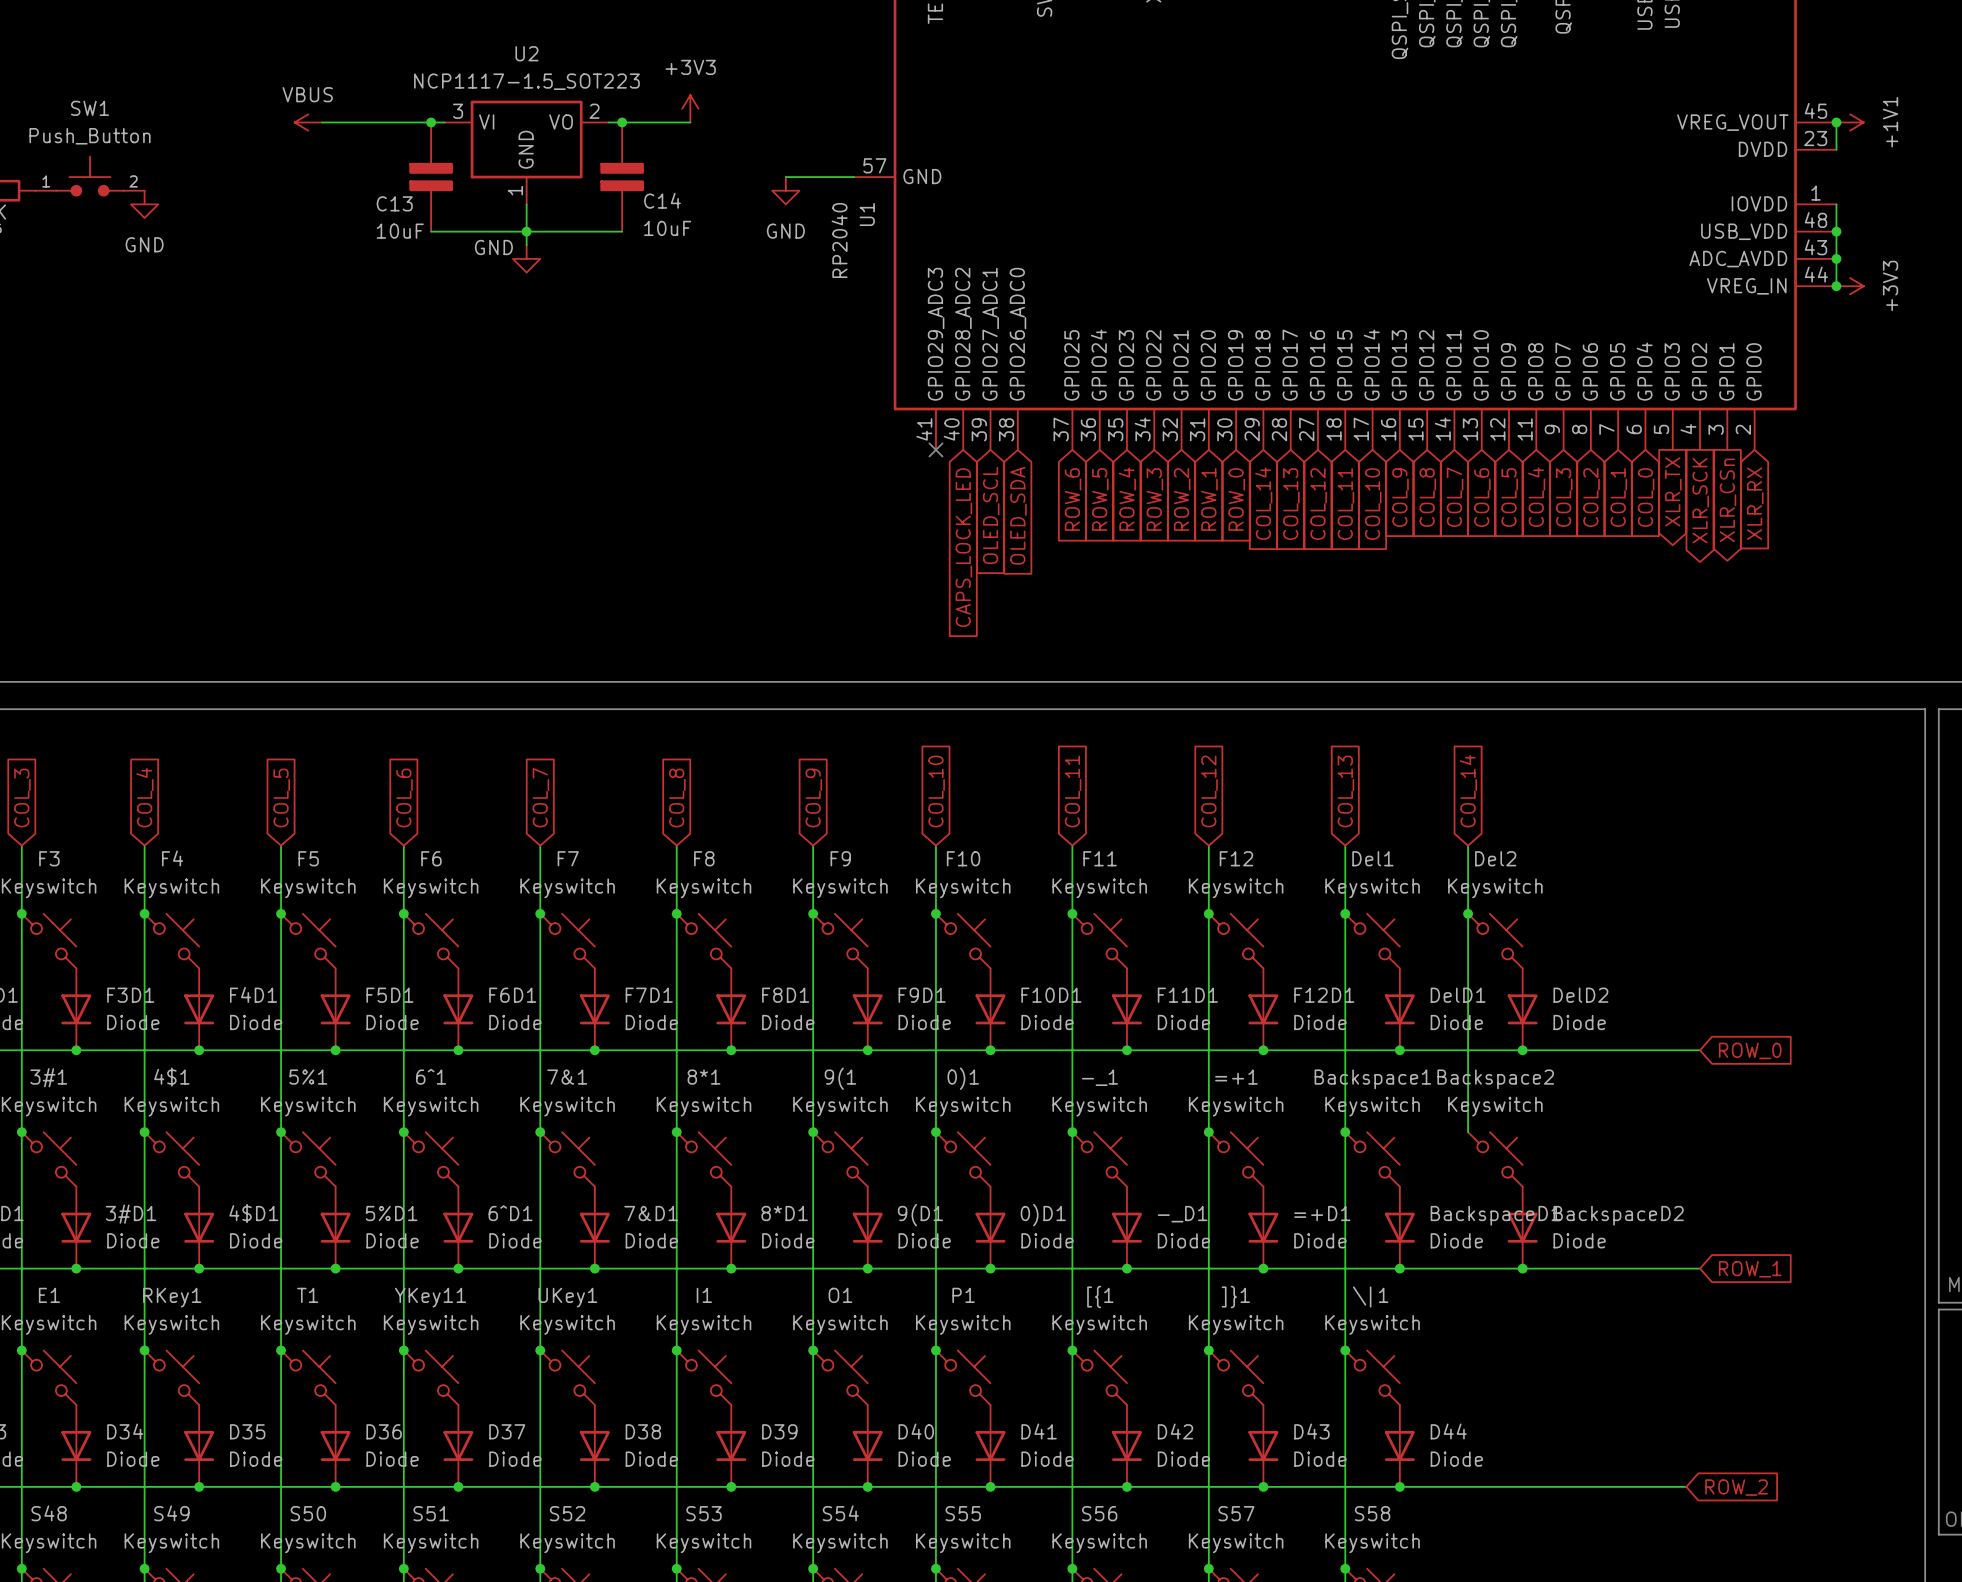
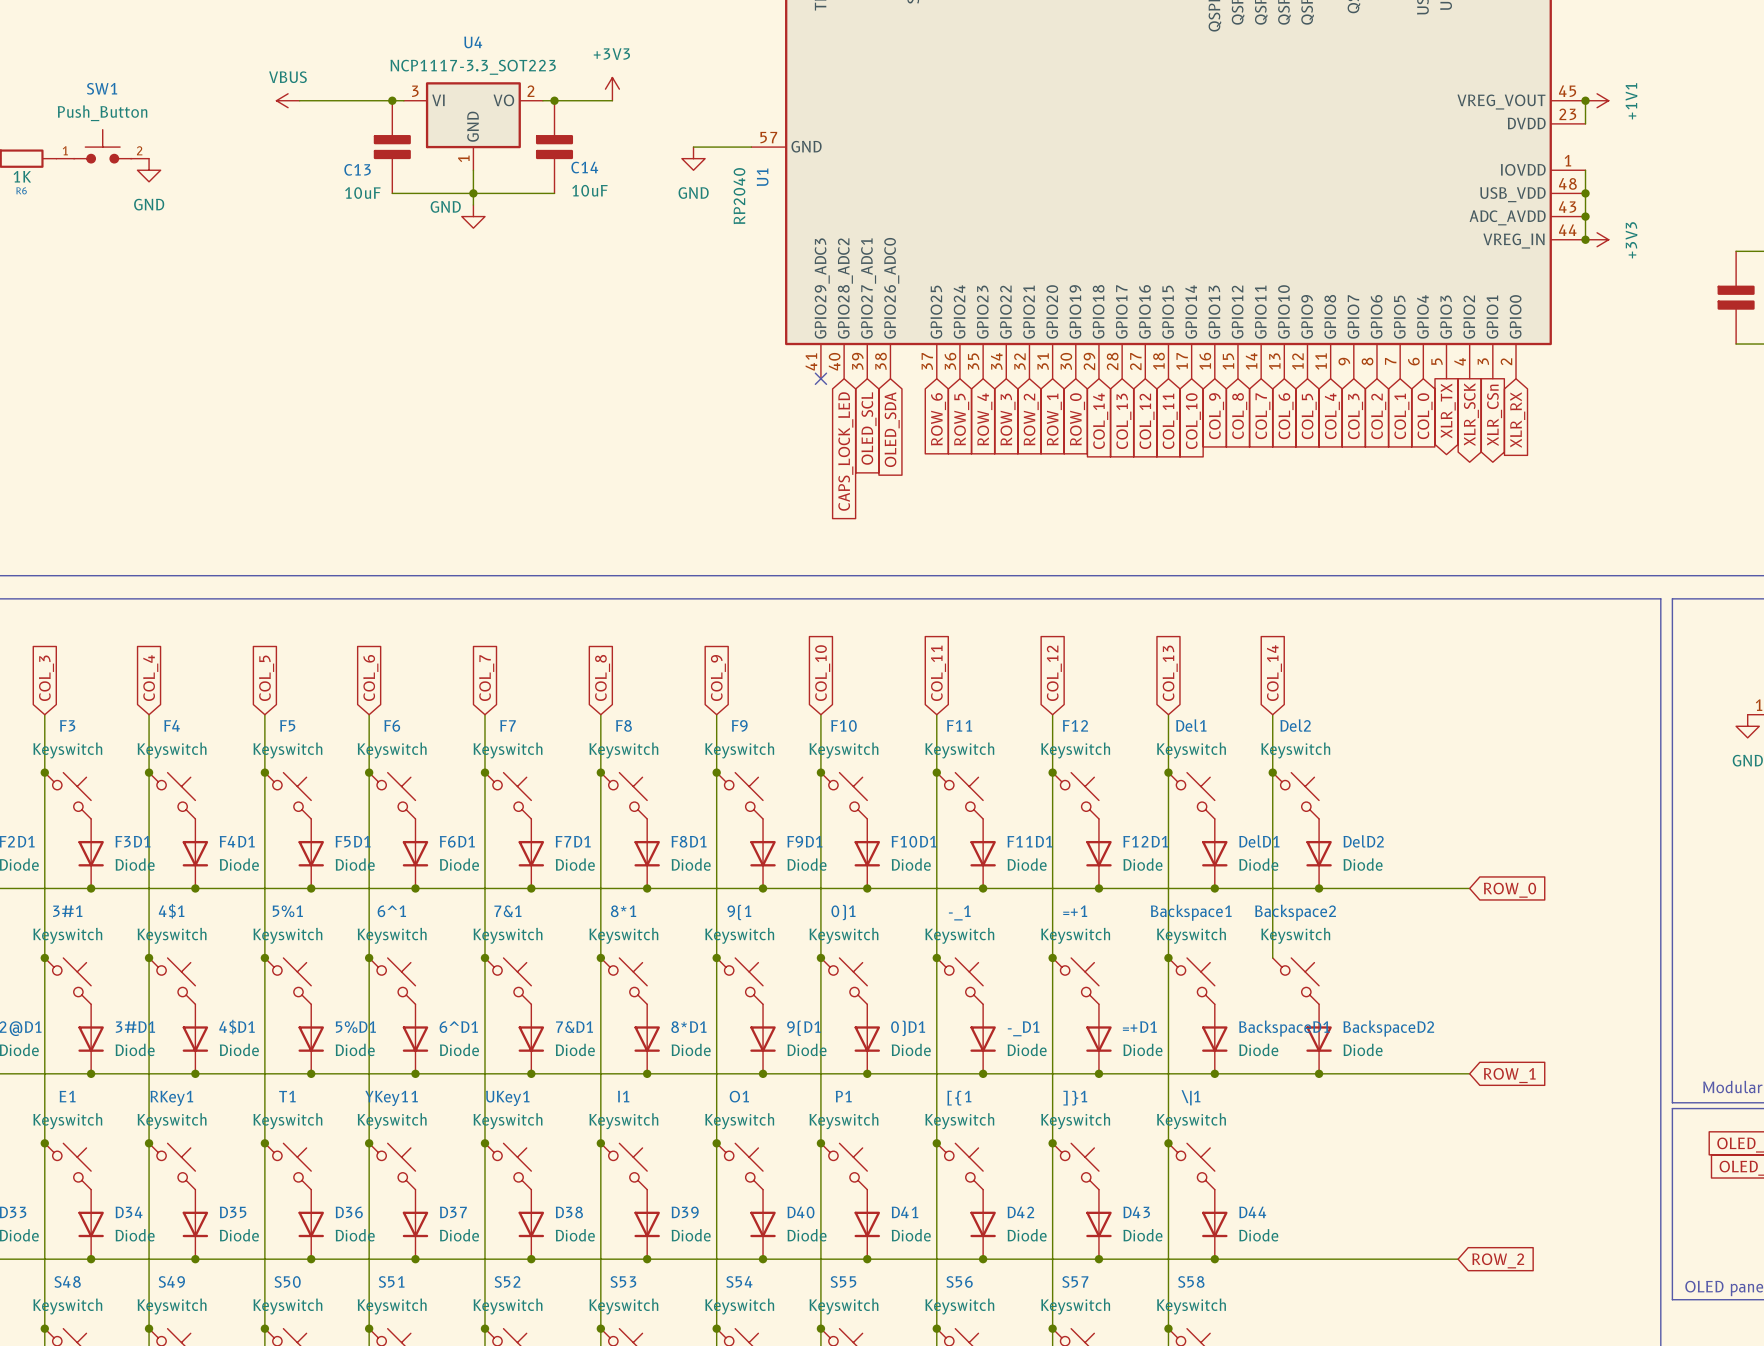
U2 name: U2 (526, 53) -> U4 (473, 42)
U2 value: NCP1117-1.5_SOT223 (526, 81) -> NCP1117-3.3_SOT223 (473, 67)

